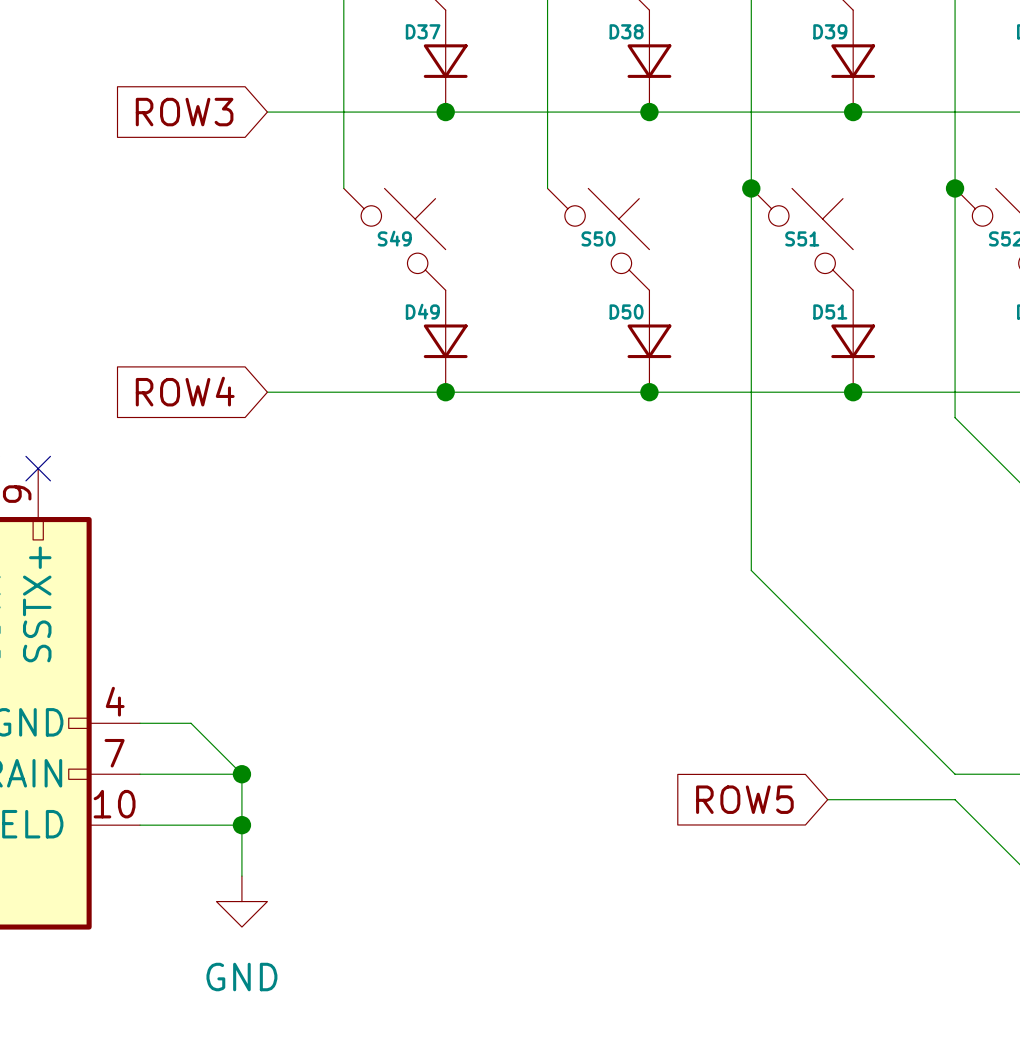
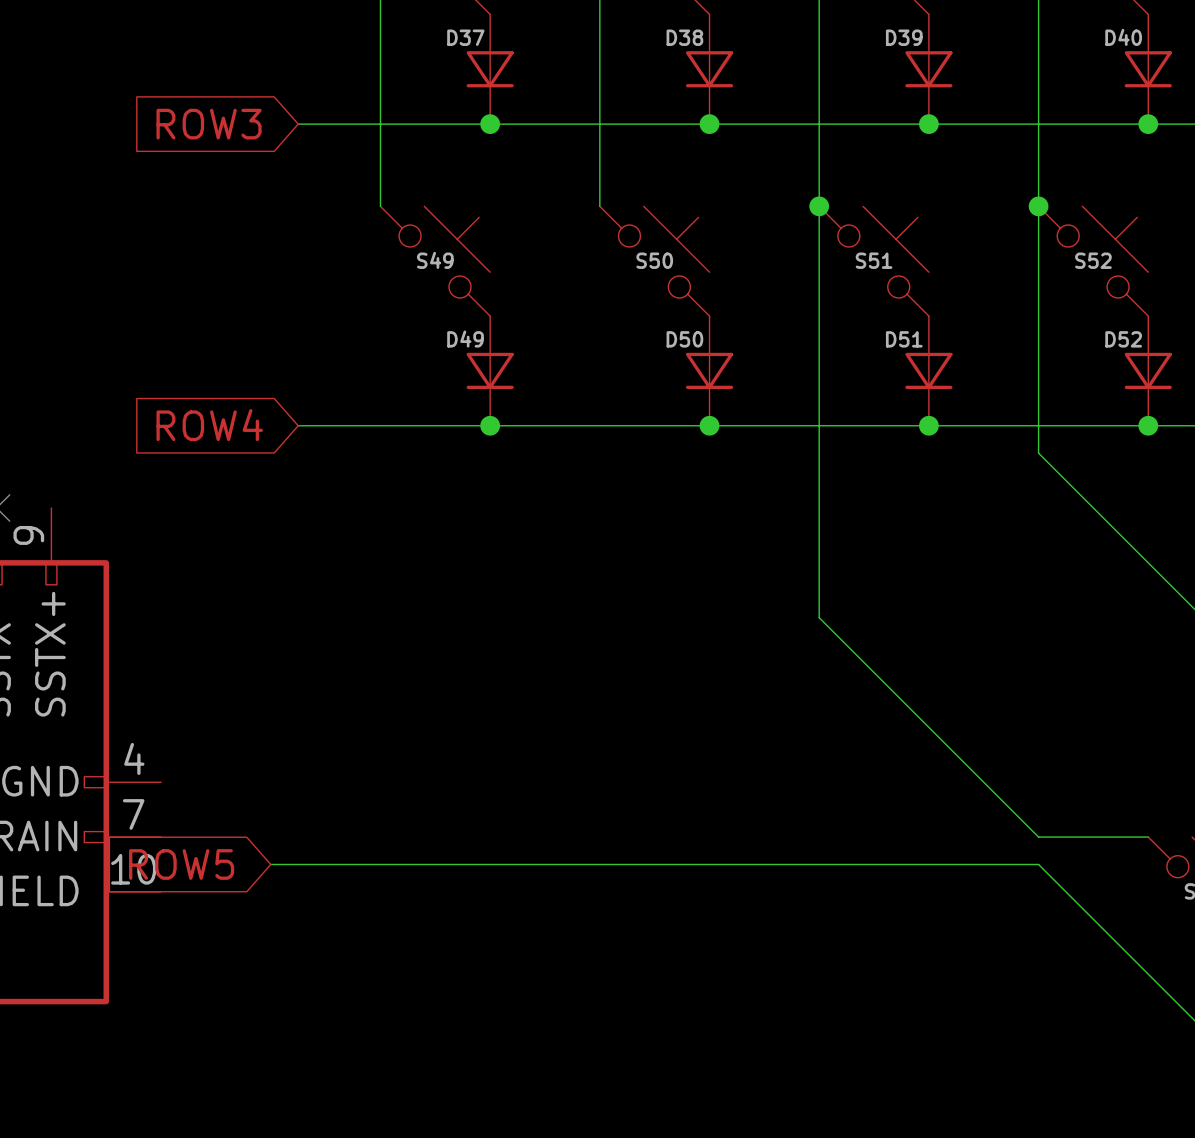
no-connect mark: (38, 468) -> none
wire: (140, 723) (191, 723) (241, 774) -> none
wire: (140, 774) (241, 774) -> none
wire: (241, 774) (241, 876) -> none
junction: (241, 774) -> none
global label: none -> ROW5 (181, 864)
wire: none -> (270, 864) (901, 864)
global label: ROW5 (744, 799) -> none
wire: (140, 825) (241, 825) -> none
junction: (241, 825) -> none
power symbol: GND (241, 901) -> none

